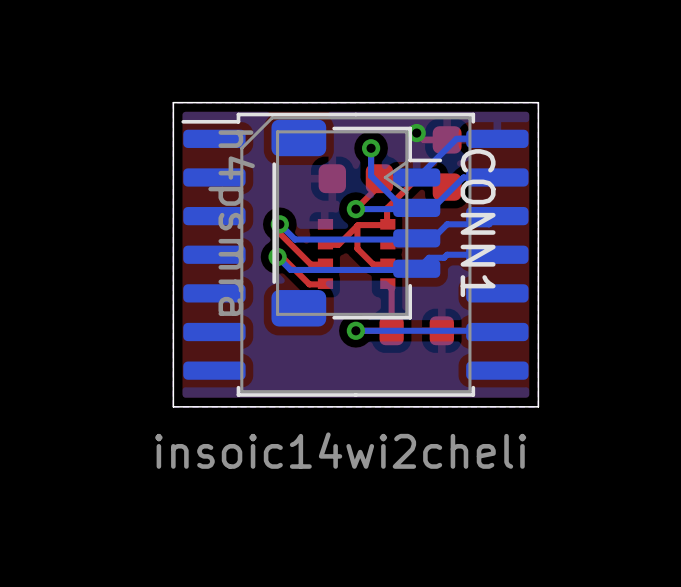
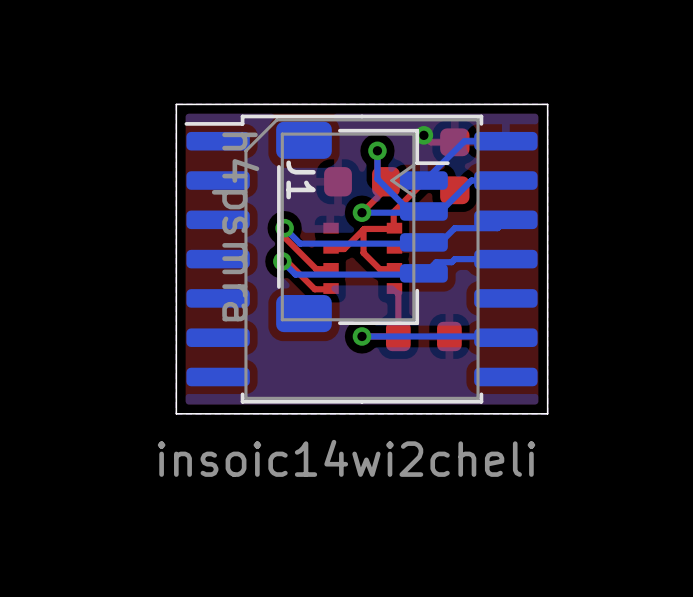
CONN1 name: CONN1 (478, 223) -> J1 (301, 179)

